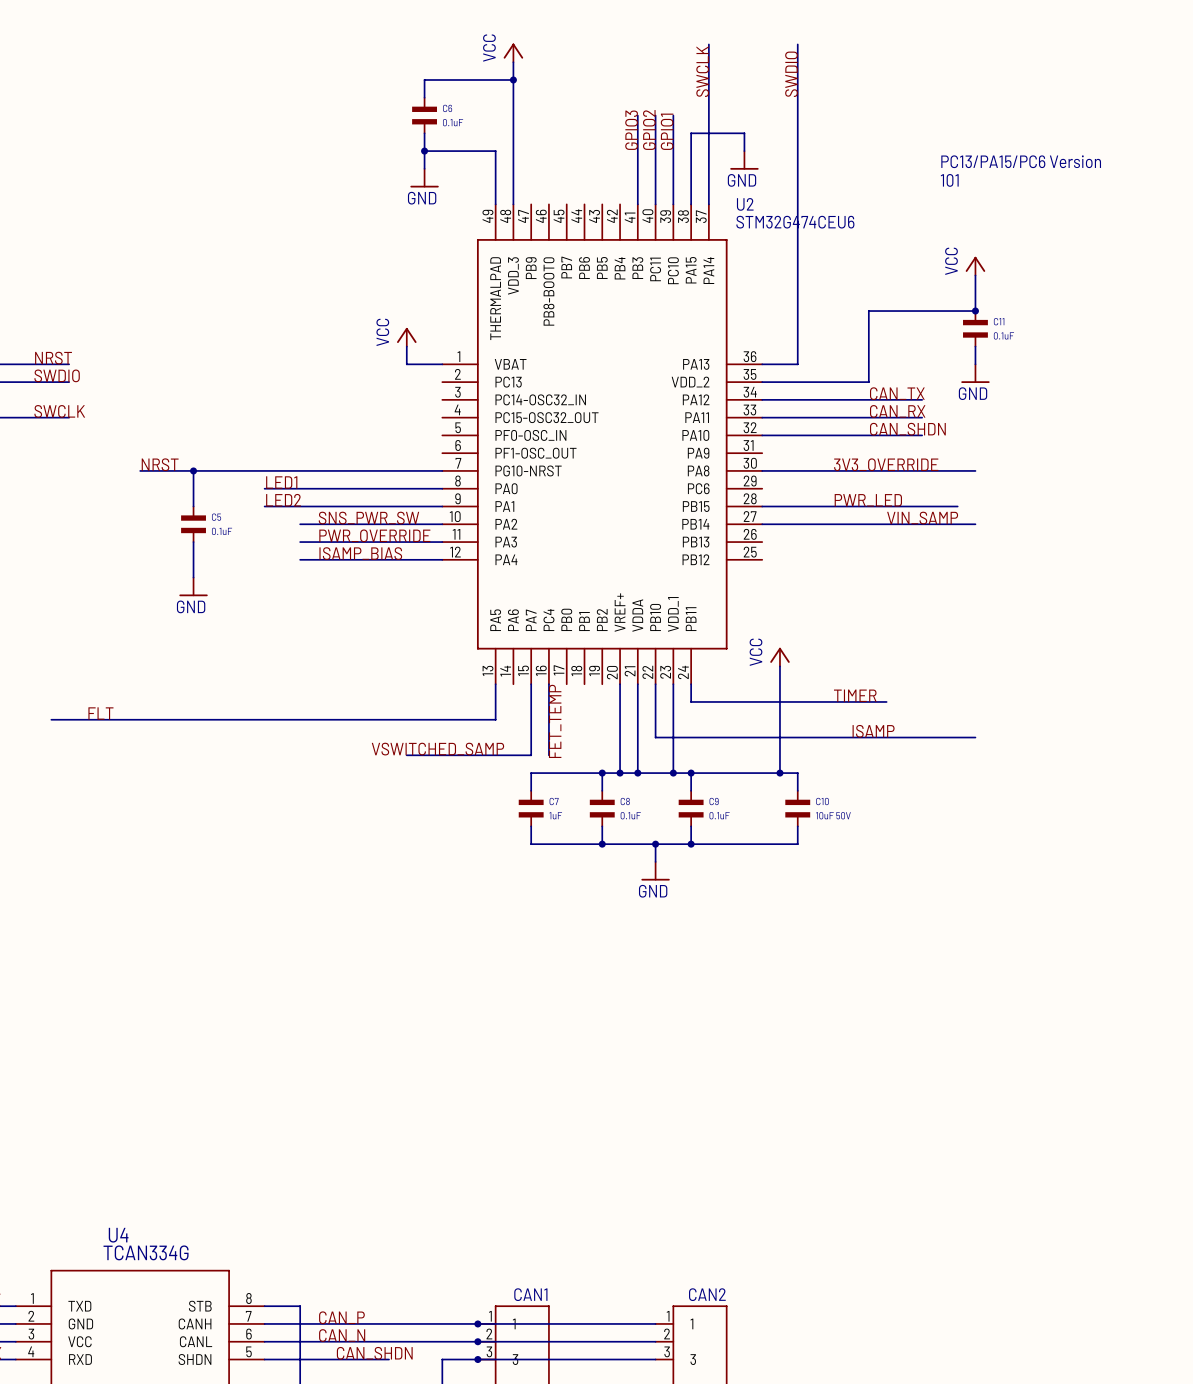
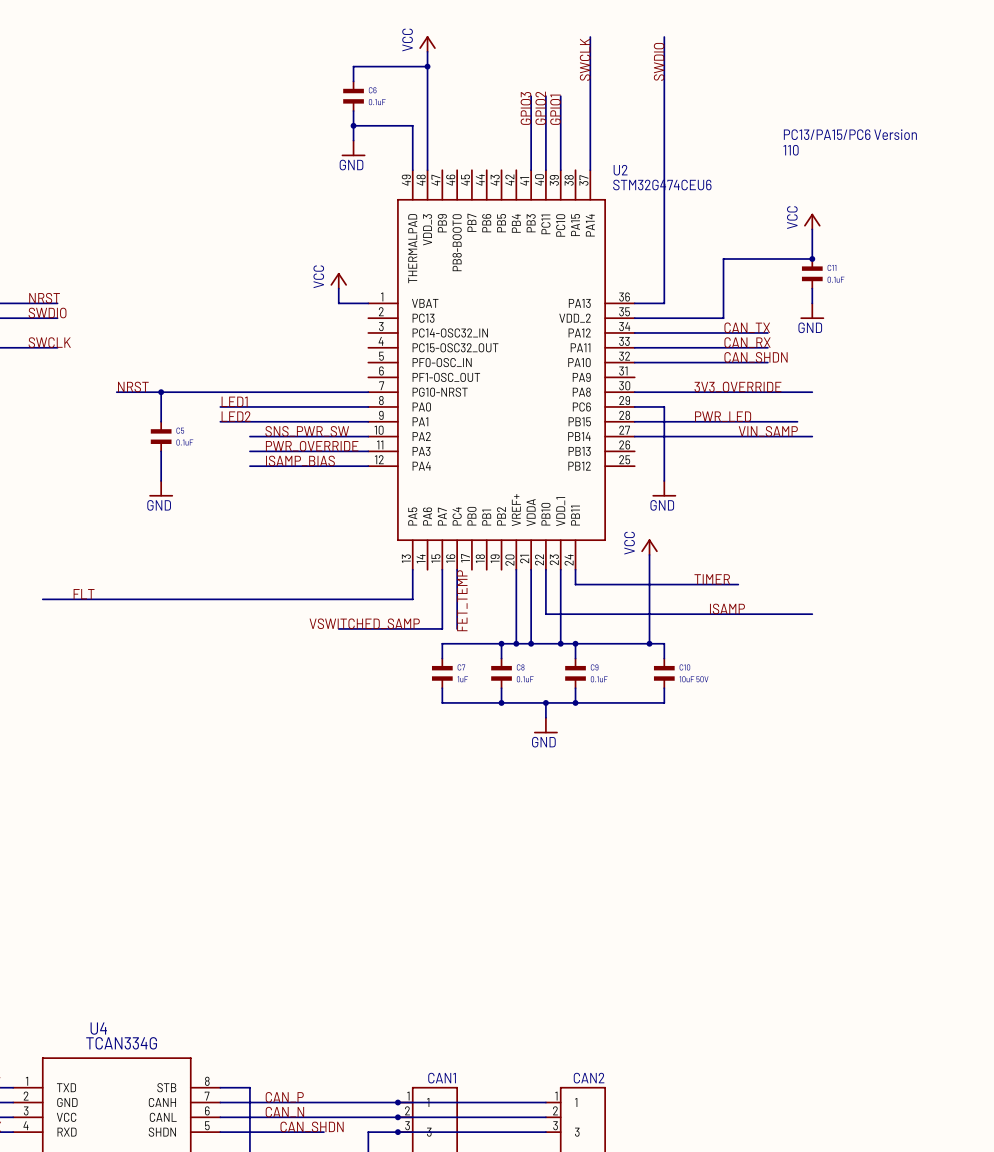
wire: (744, 151) (744, 133) (691, 133) (691, 204) -> none
power symbol: GND (744, 160) -> none
text: 101 (949, 180) -> 110 (791, 150)
wire: none -> (634, 406) (664, 406) (664, 480)
power symbol: none -> GND (664, 488)

